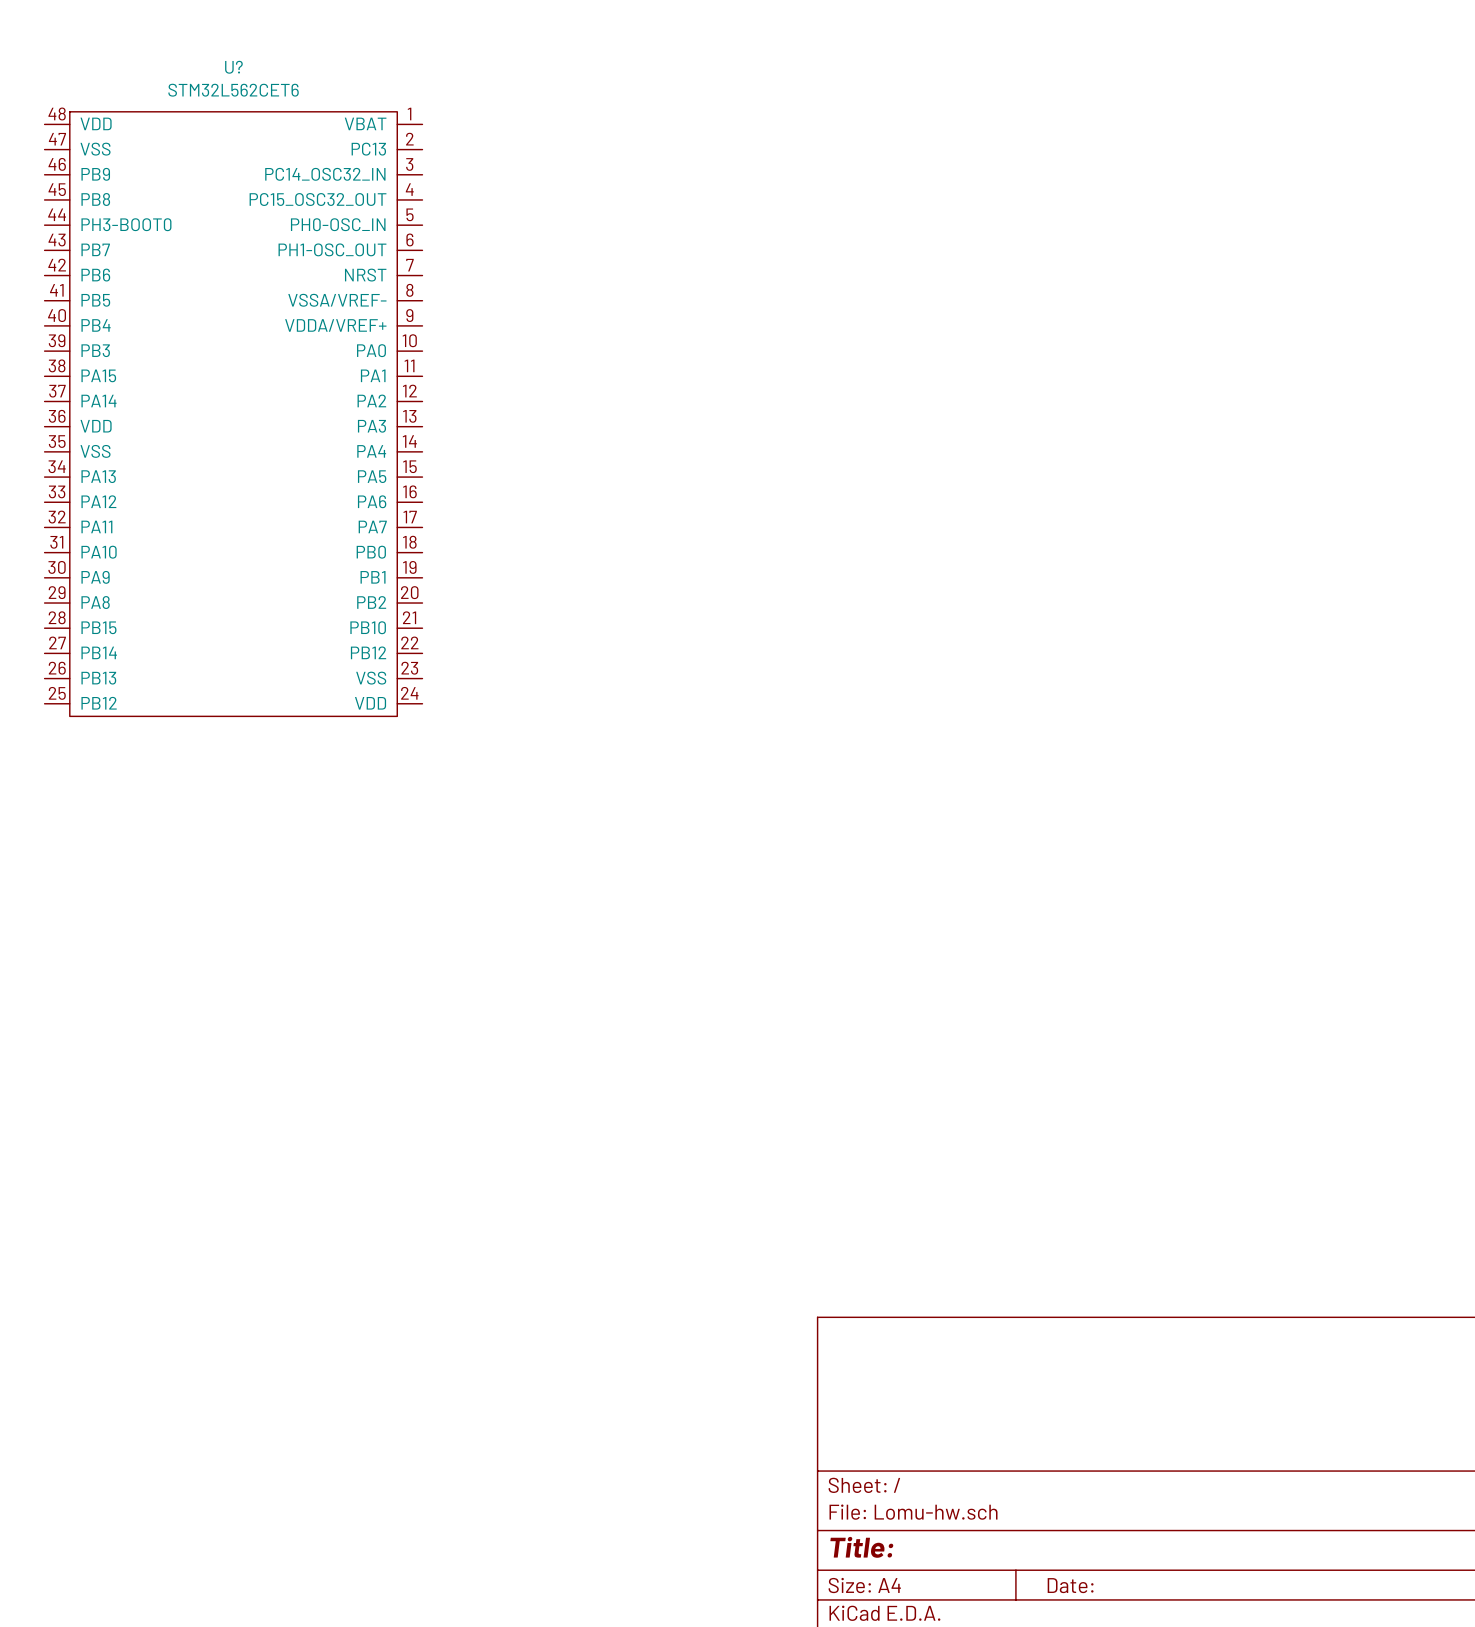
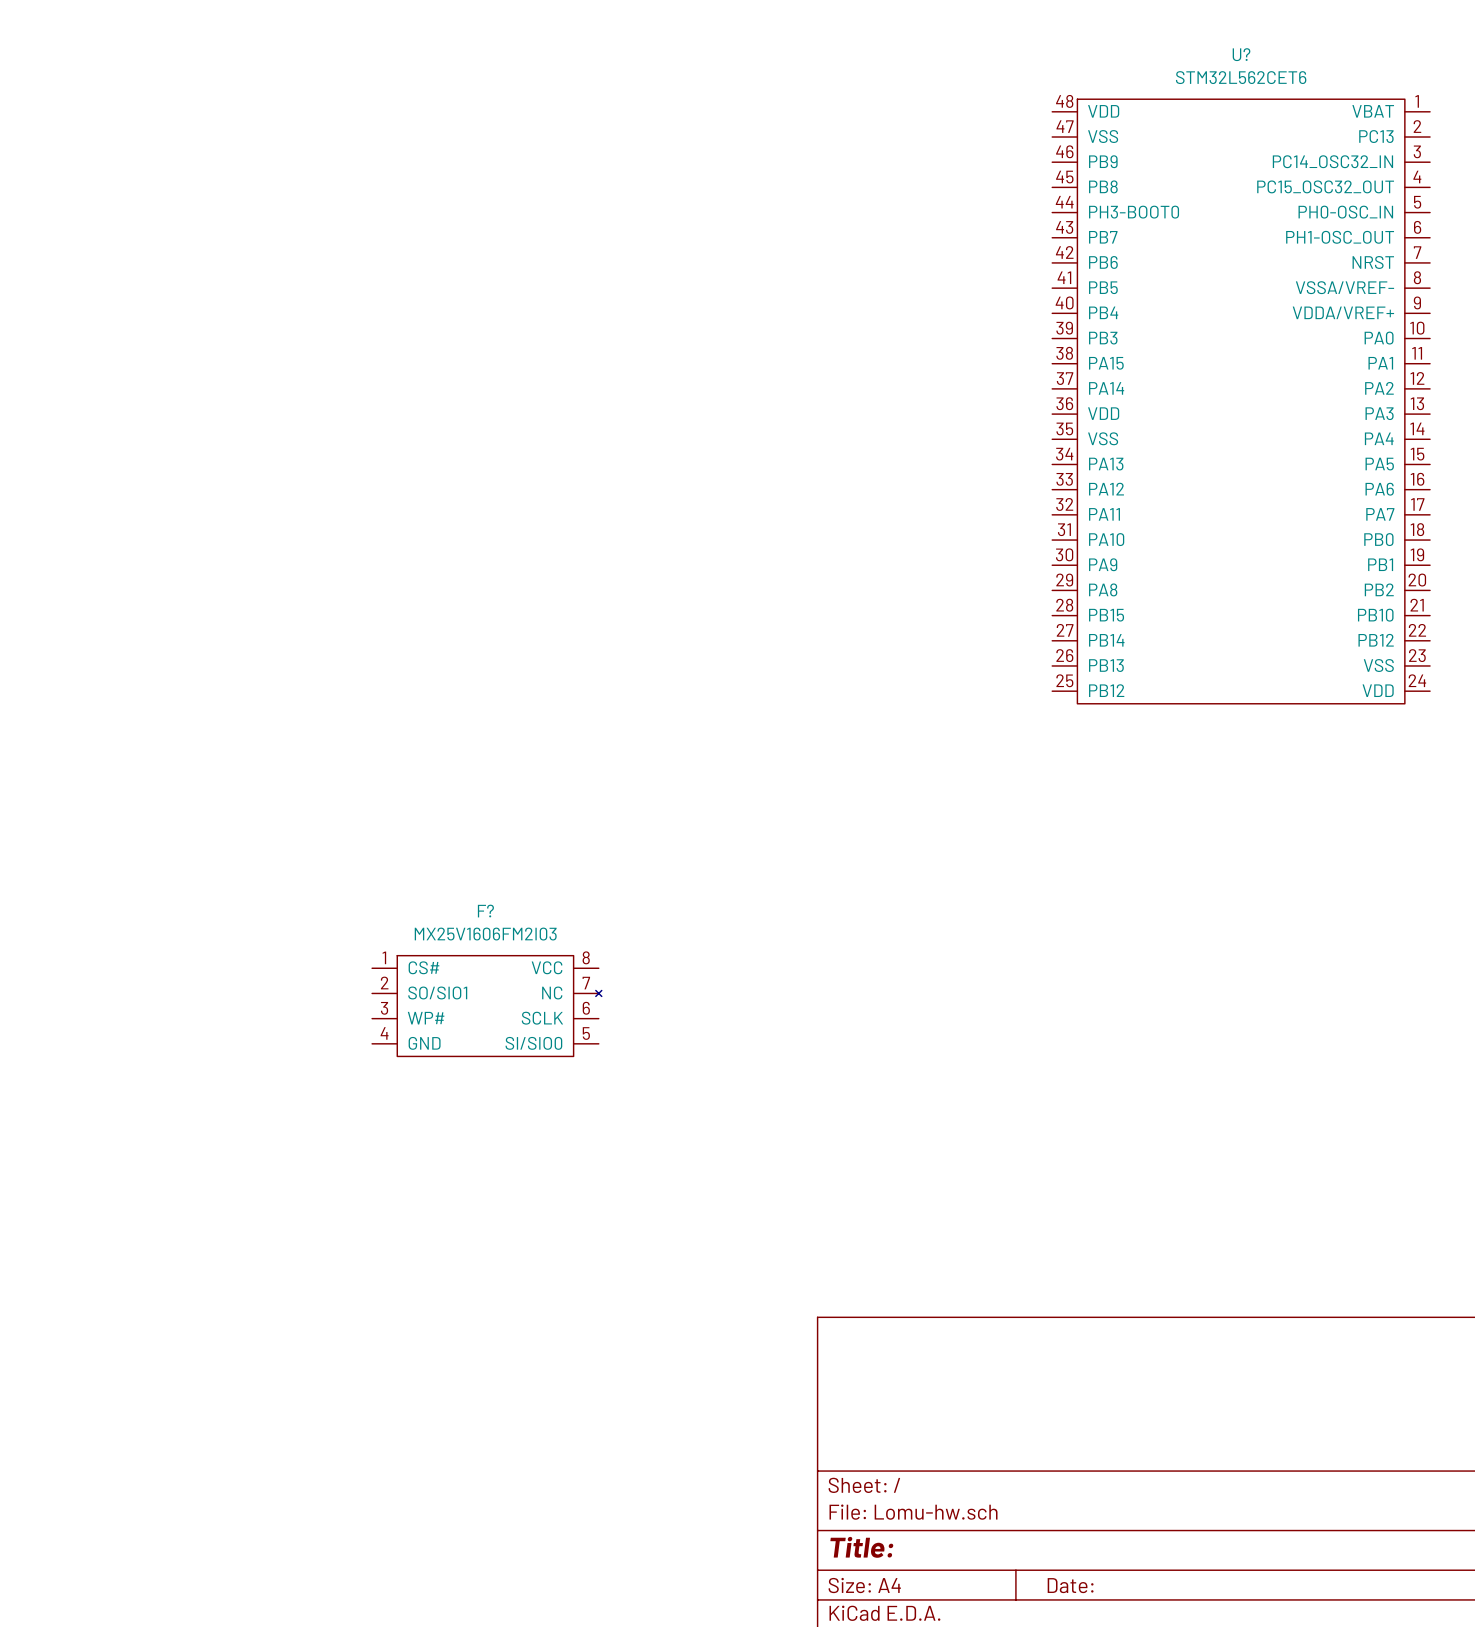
U?: none -> STM32L562CET6 (1241, 401)
U?: STM32L562CET6 (233, 414) -> none
F?: none -> MX25V1606FM2I03 (486, 1006)

